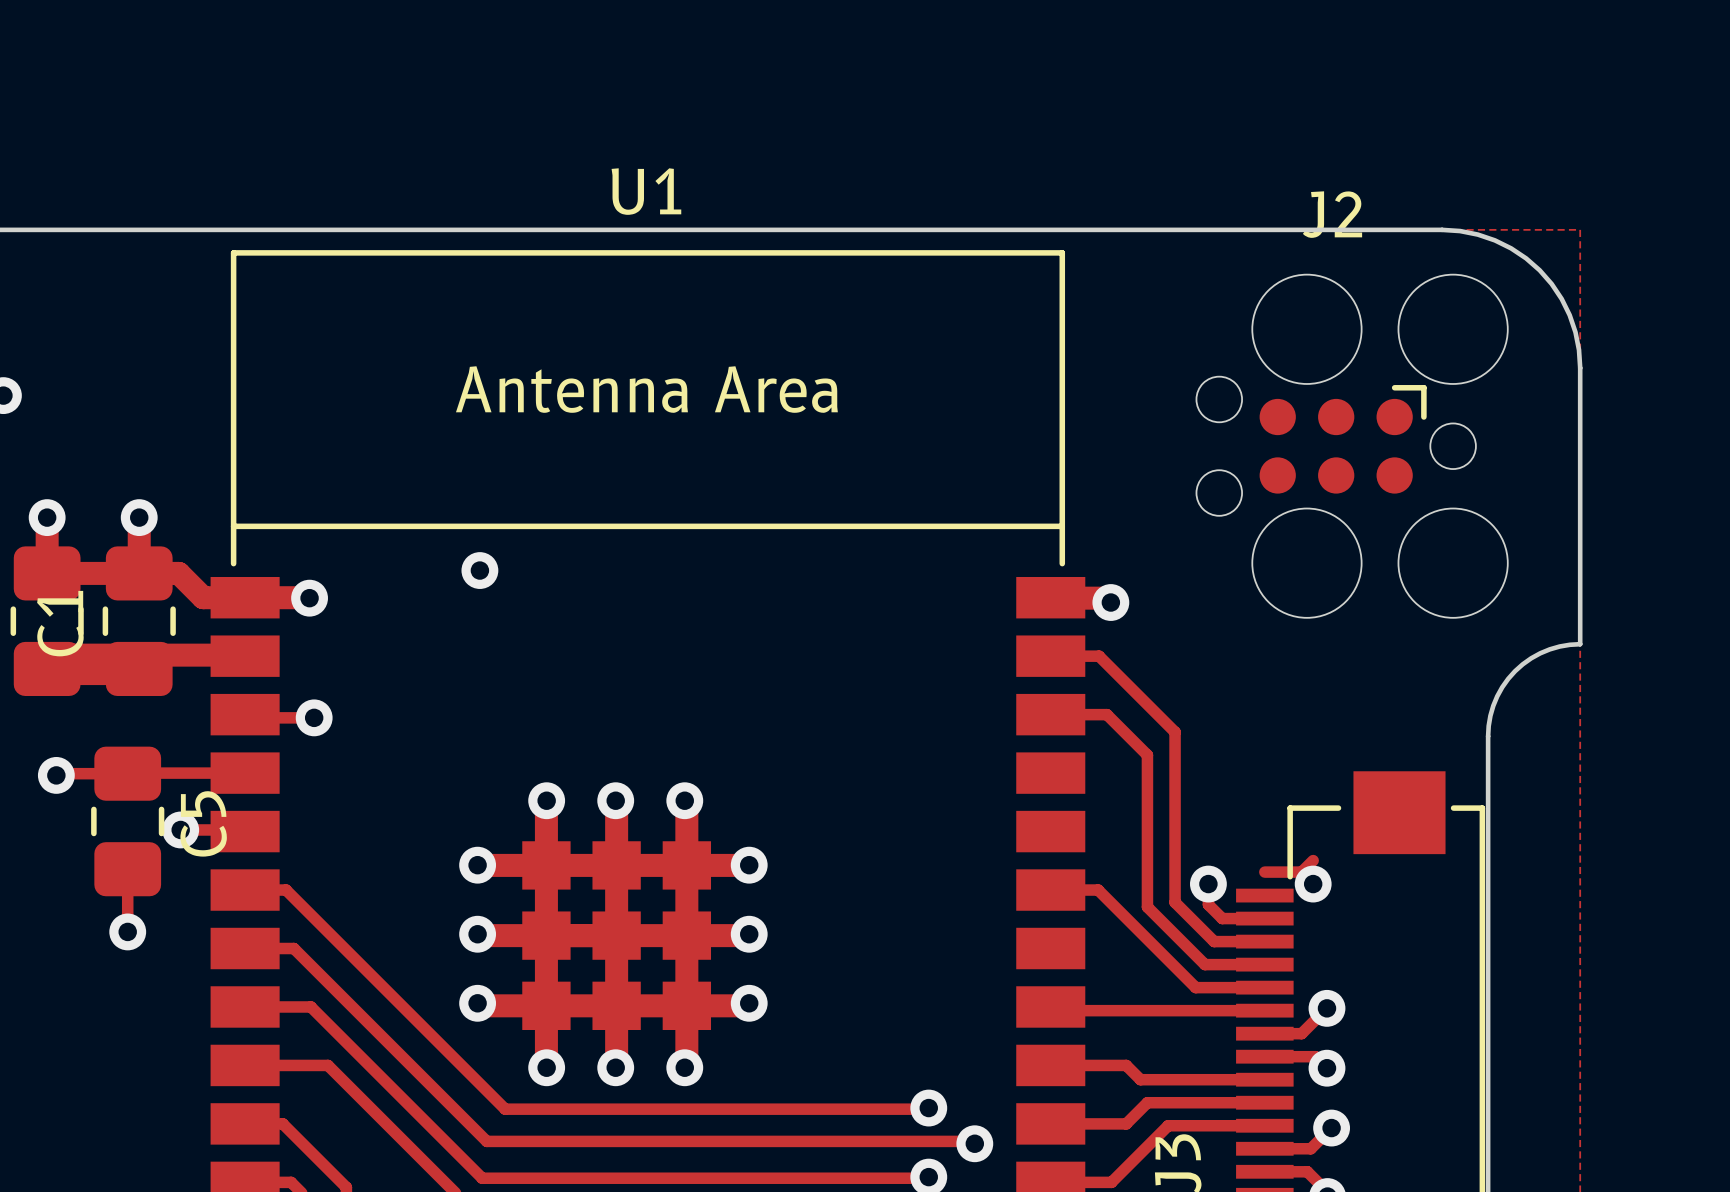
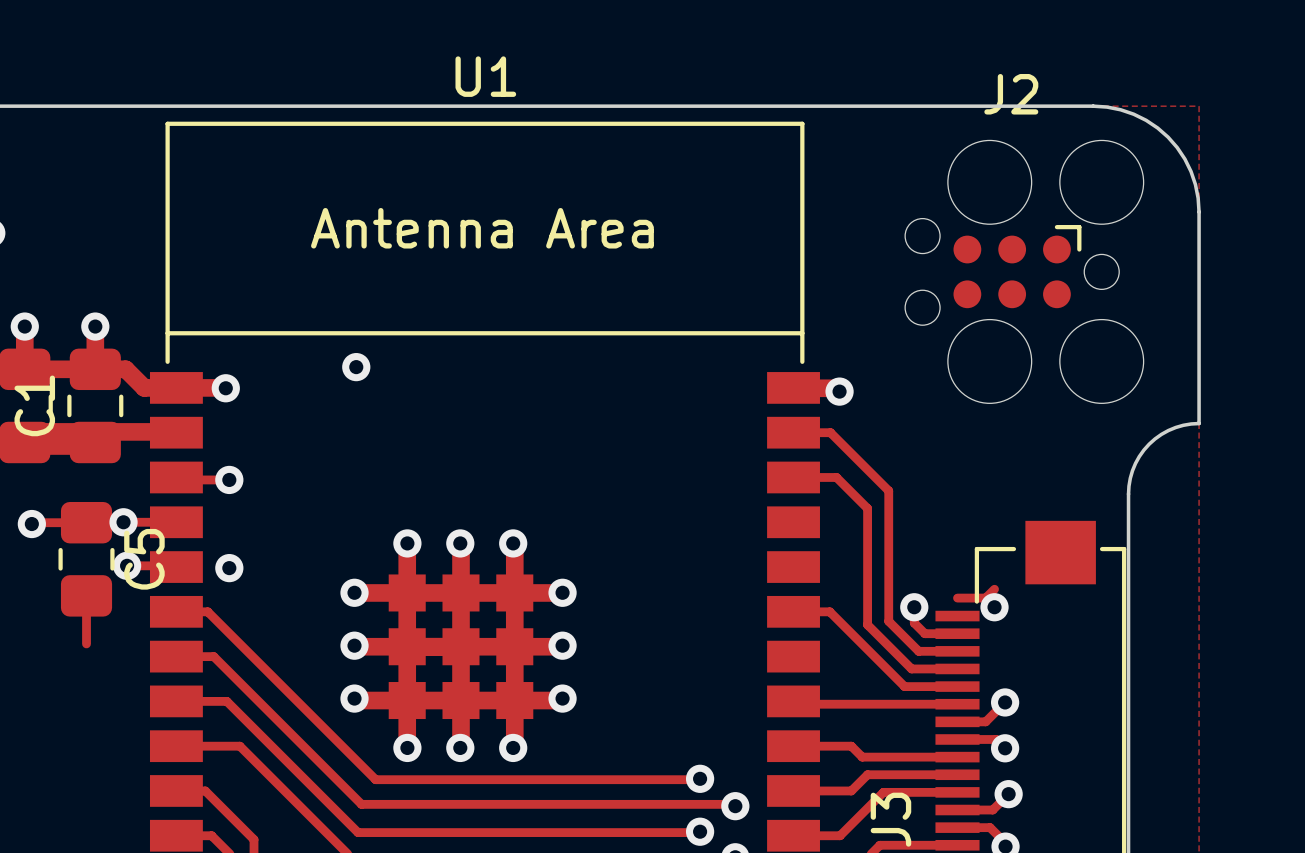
via: none -> (123, 522)
via: none -> (229, 568)
via: (127, 931) -> none

